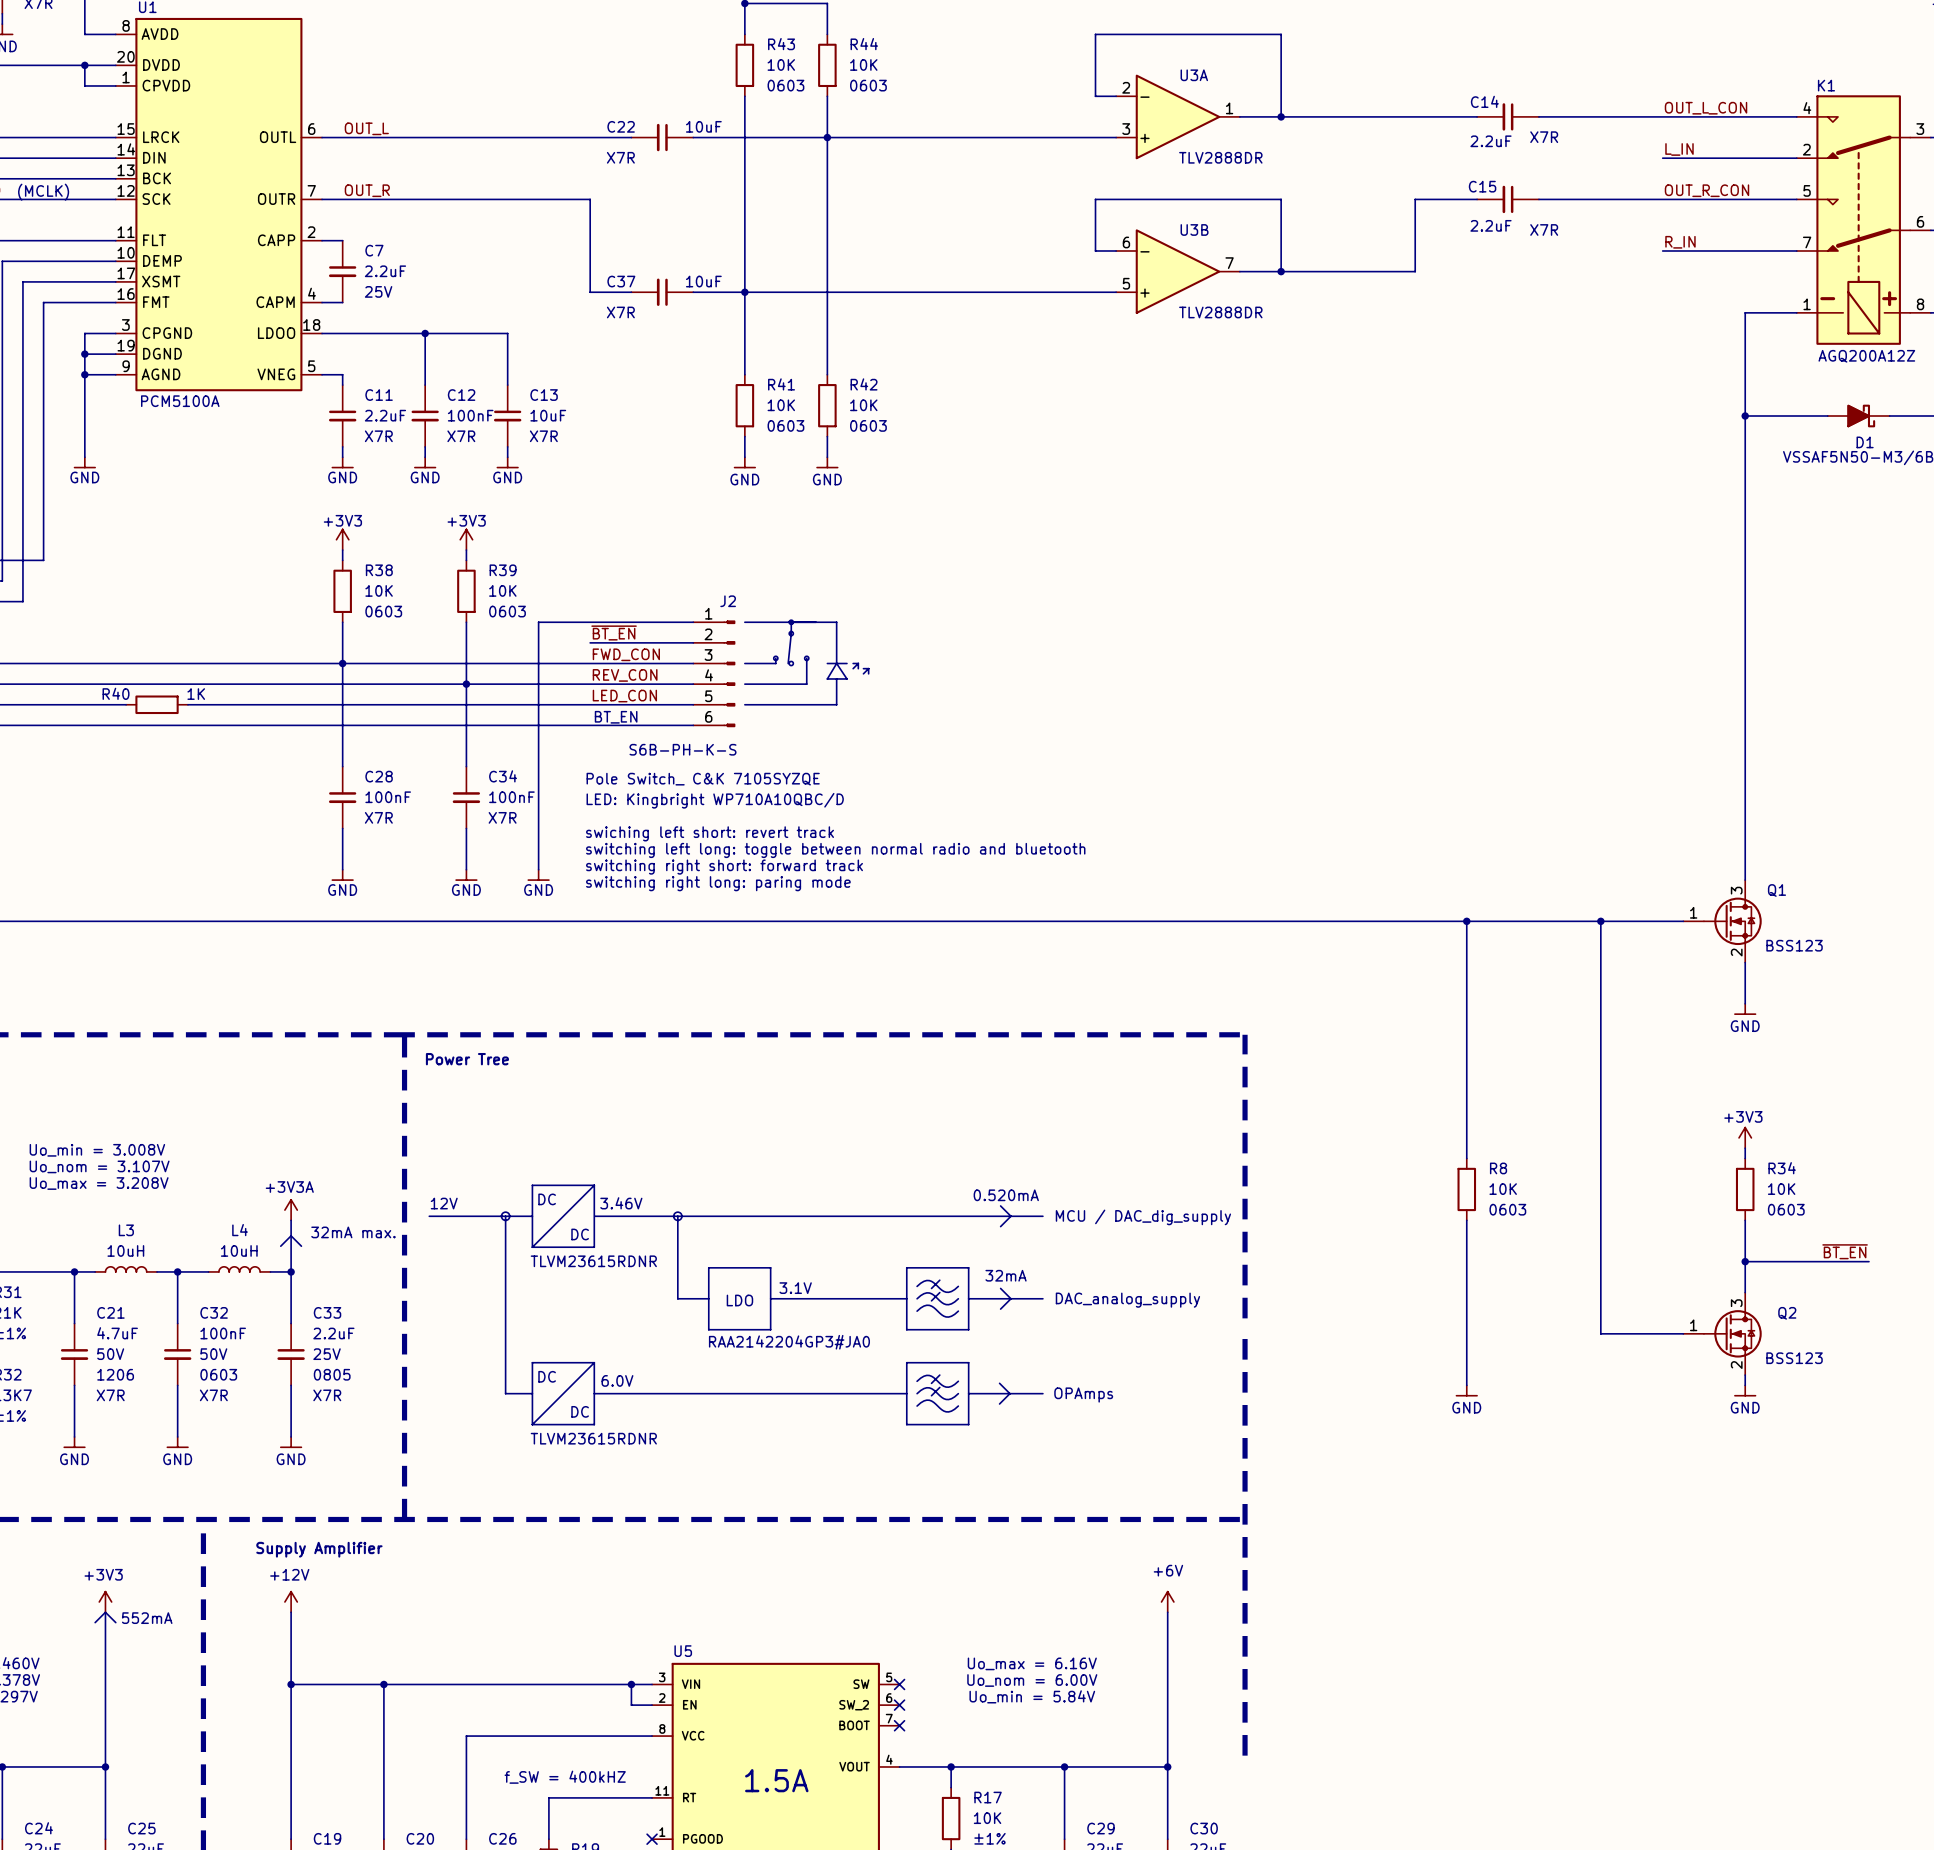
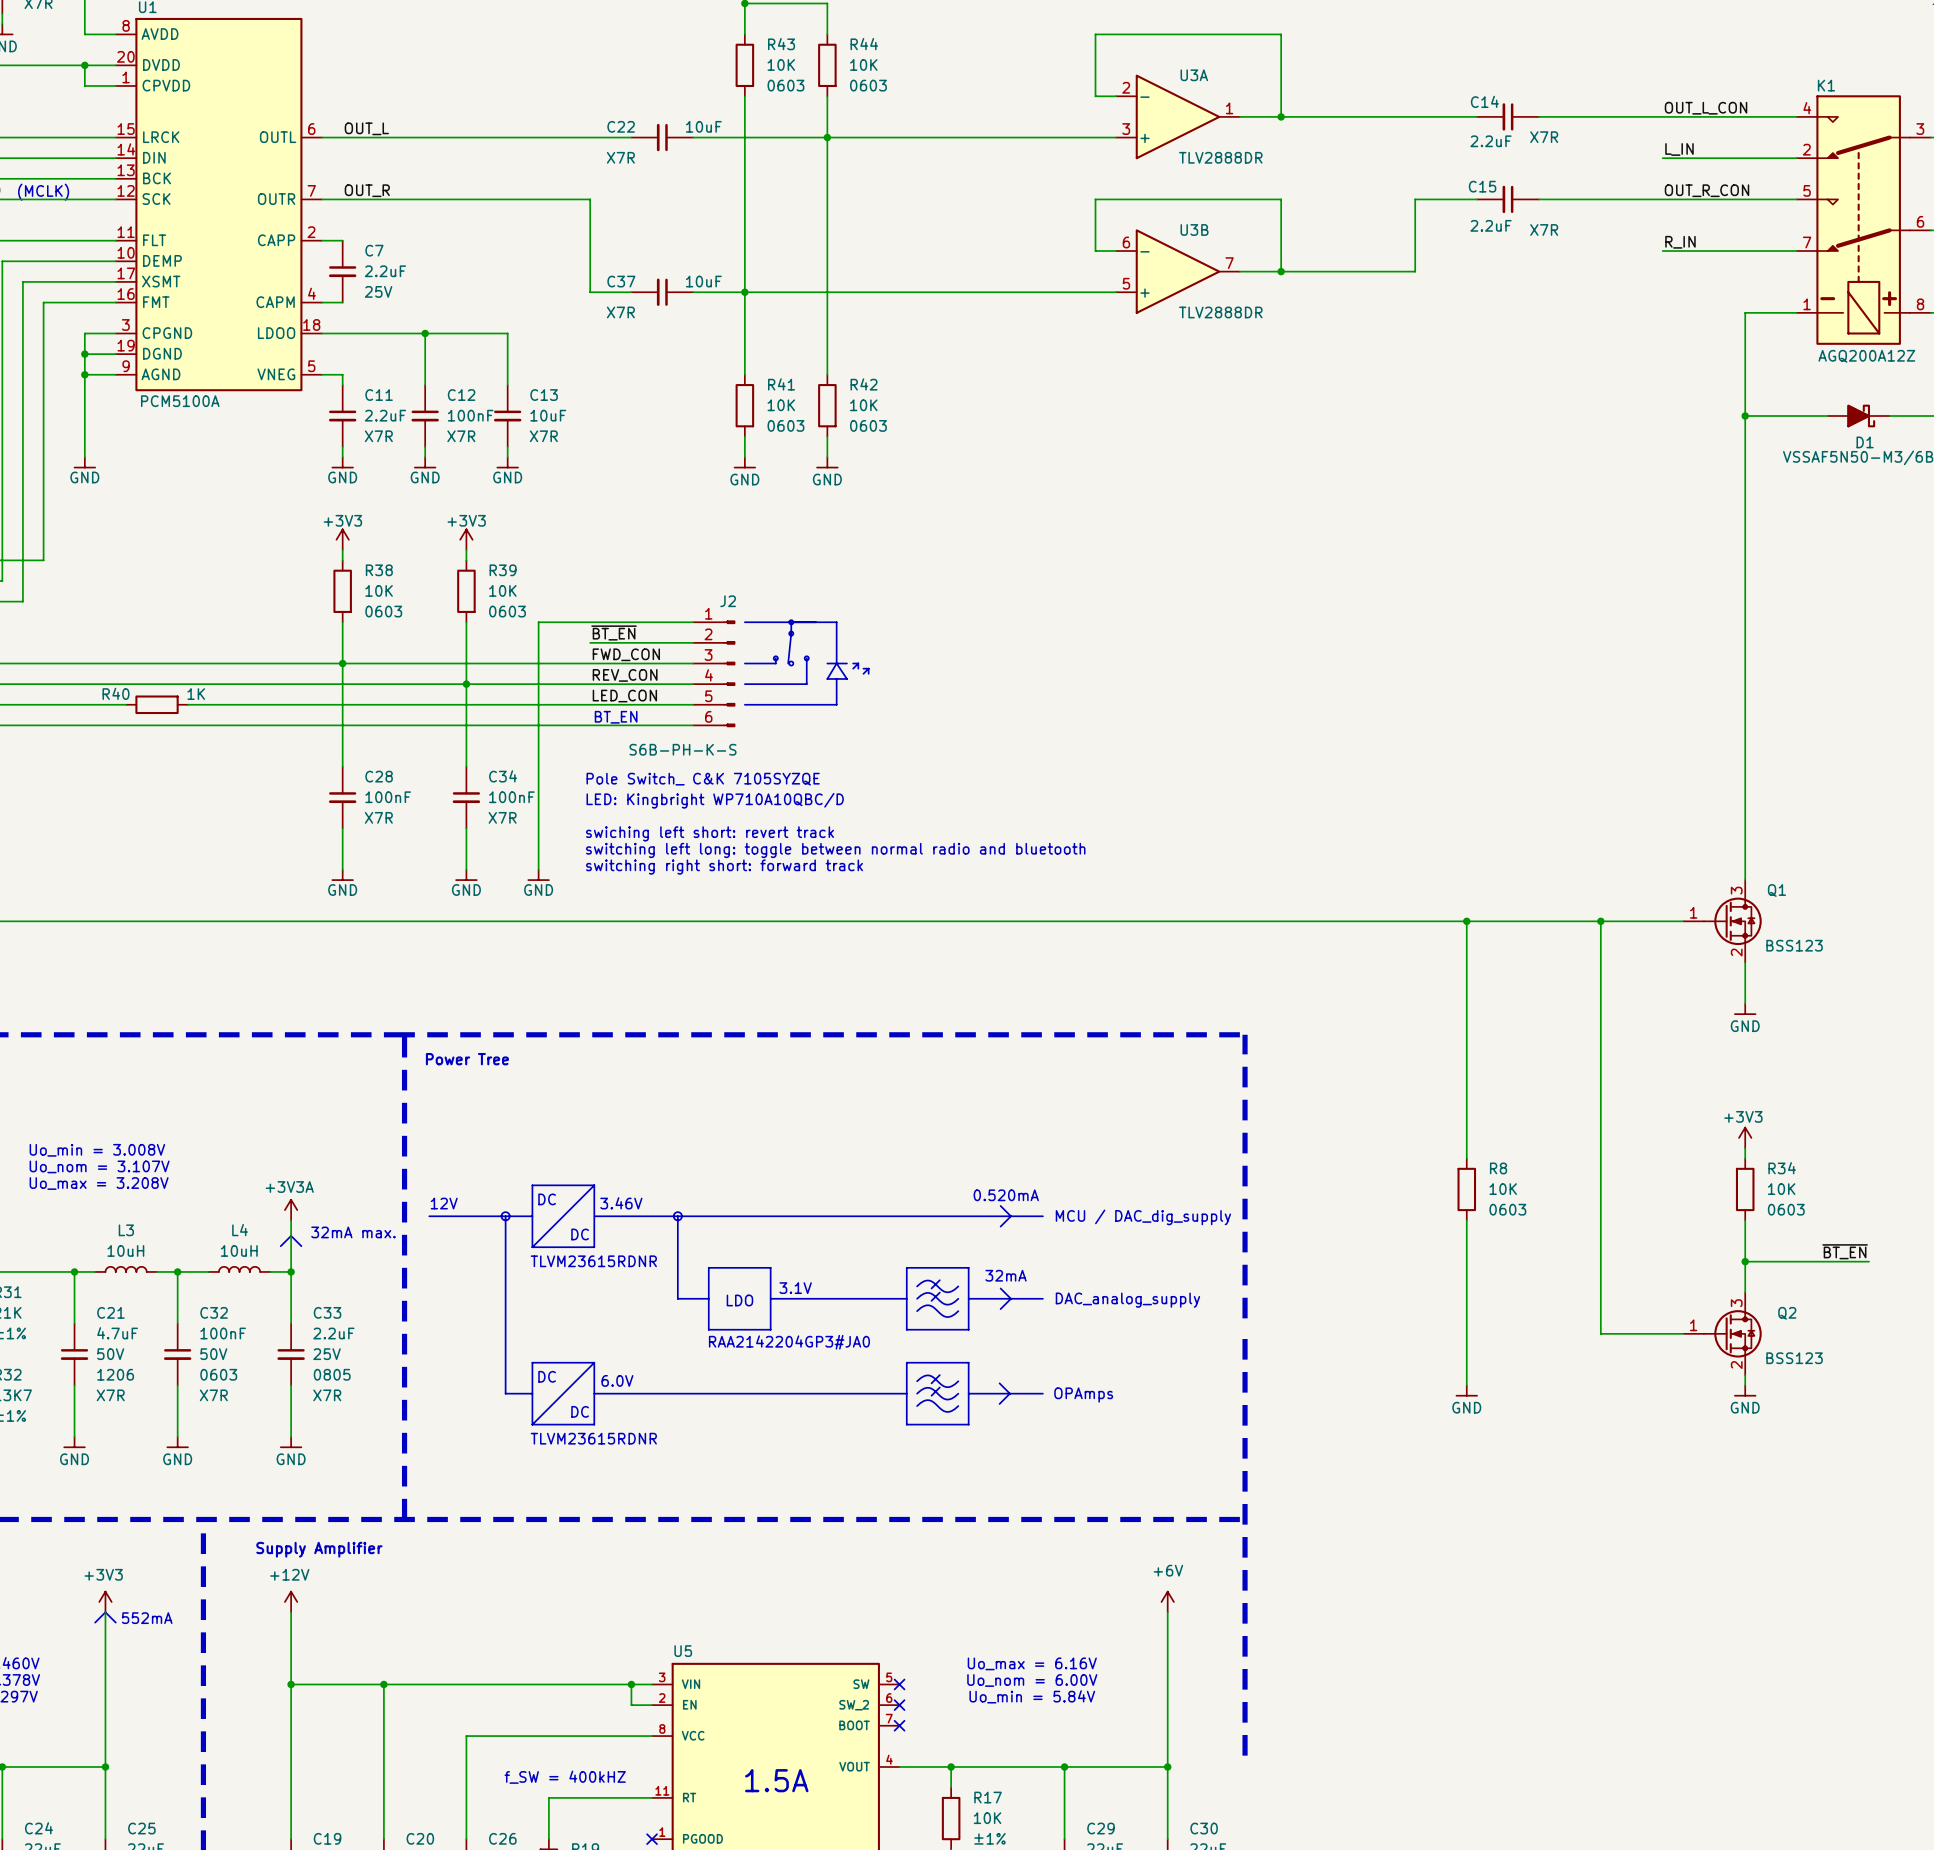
text: switching right long: paring mode (718, 883) -> none

